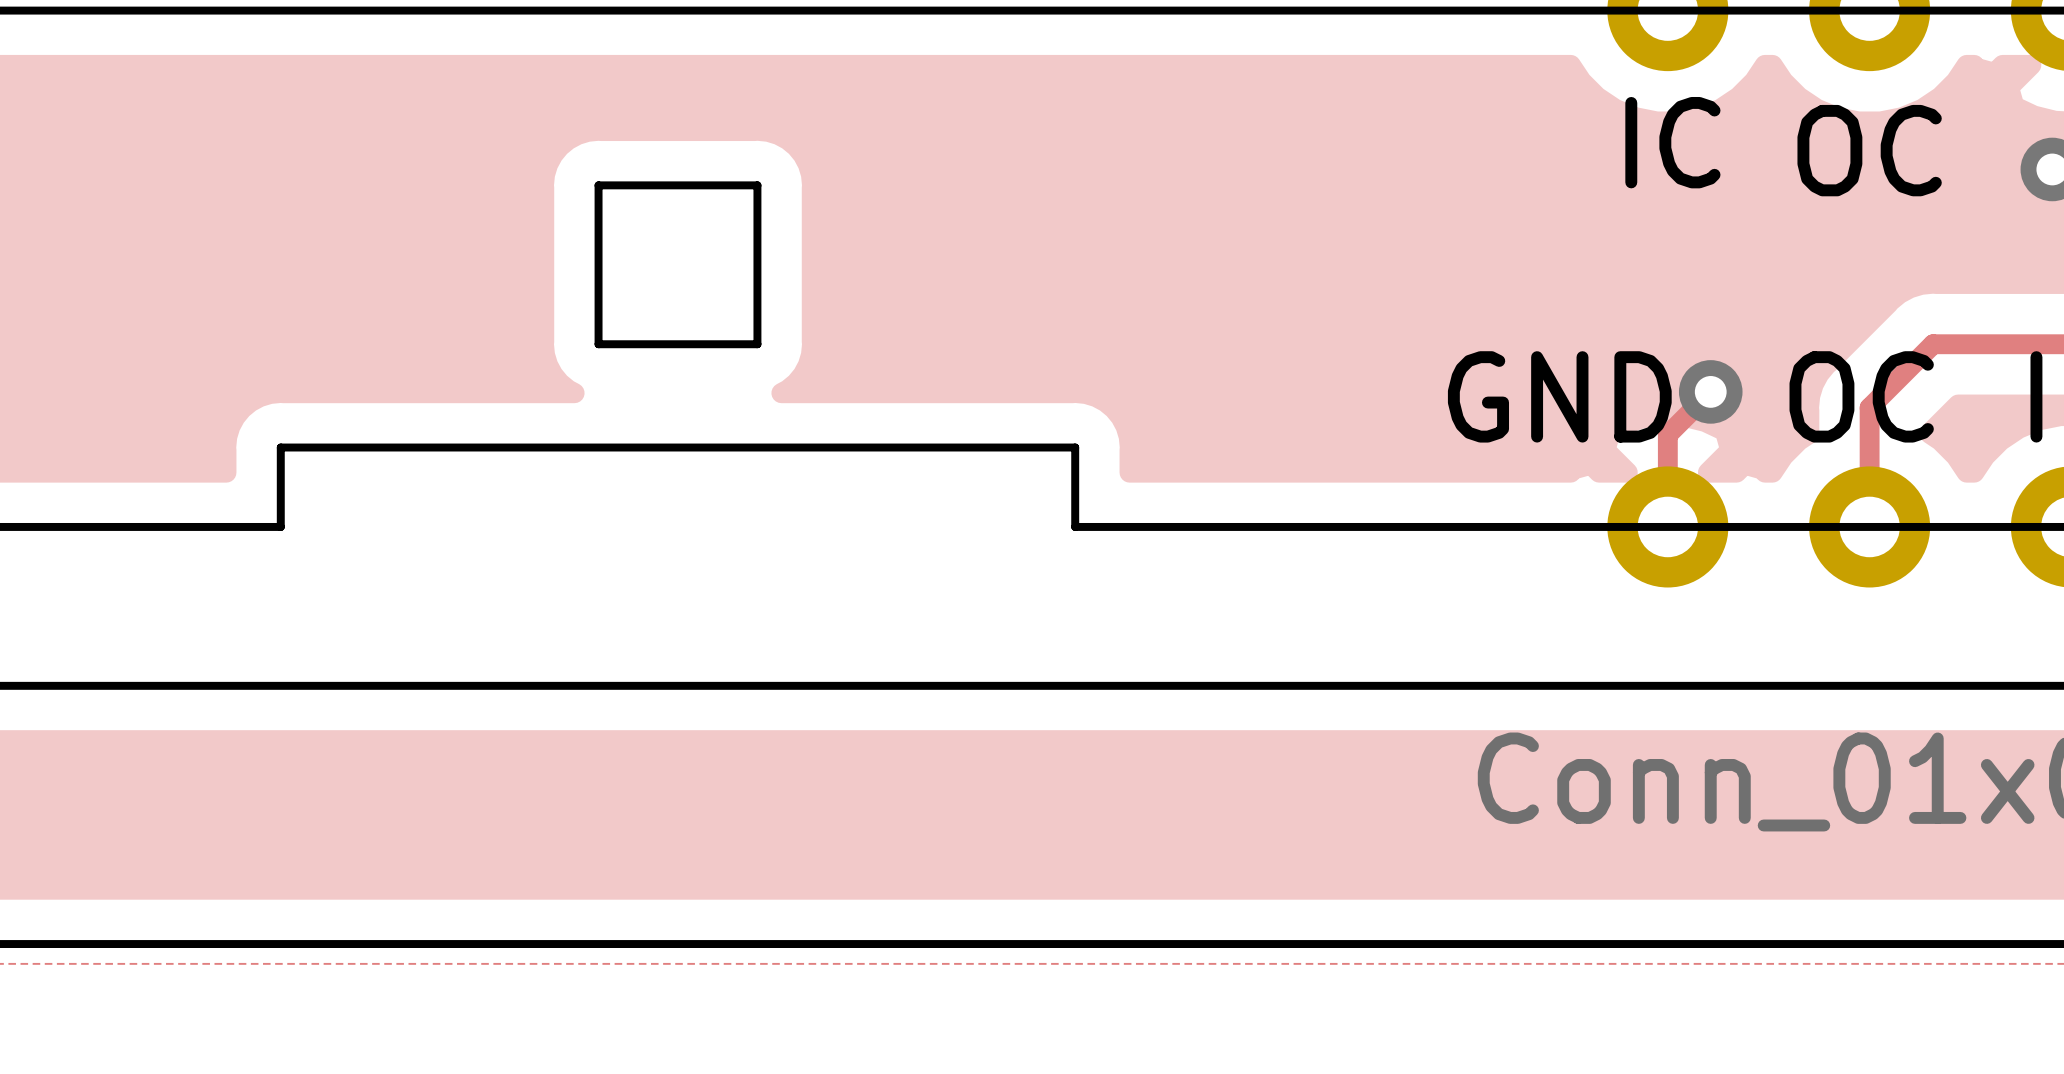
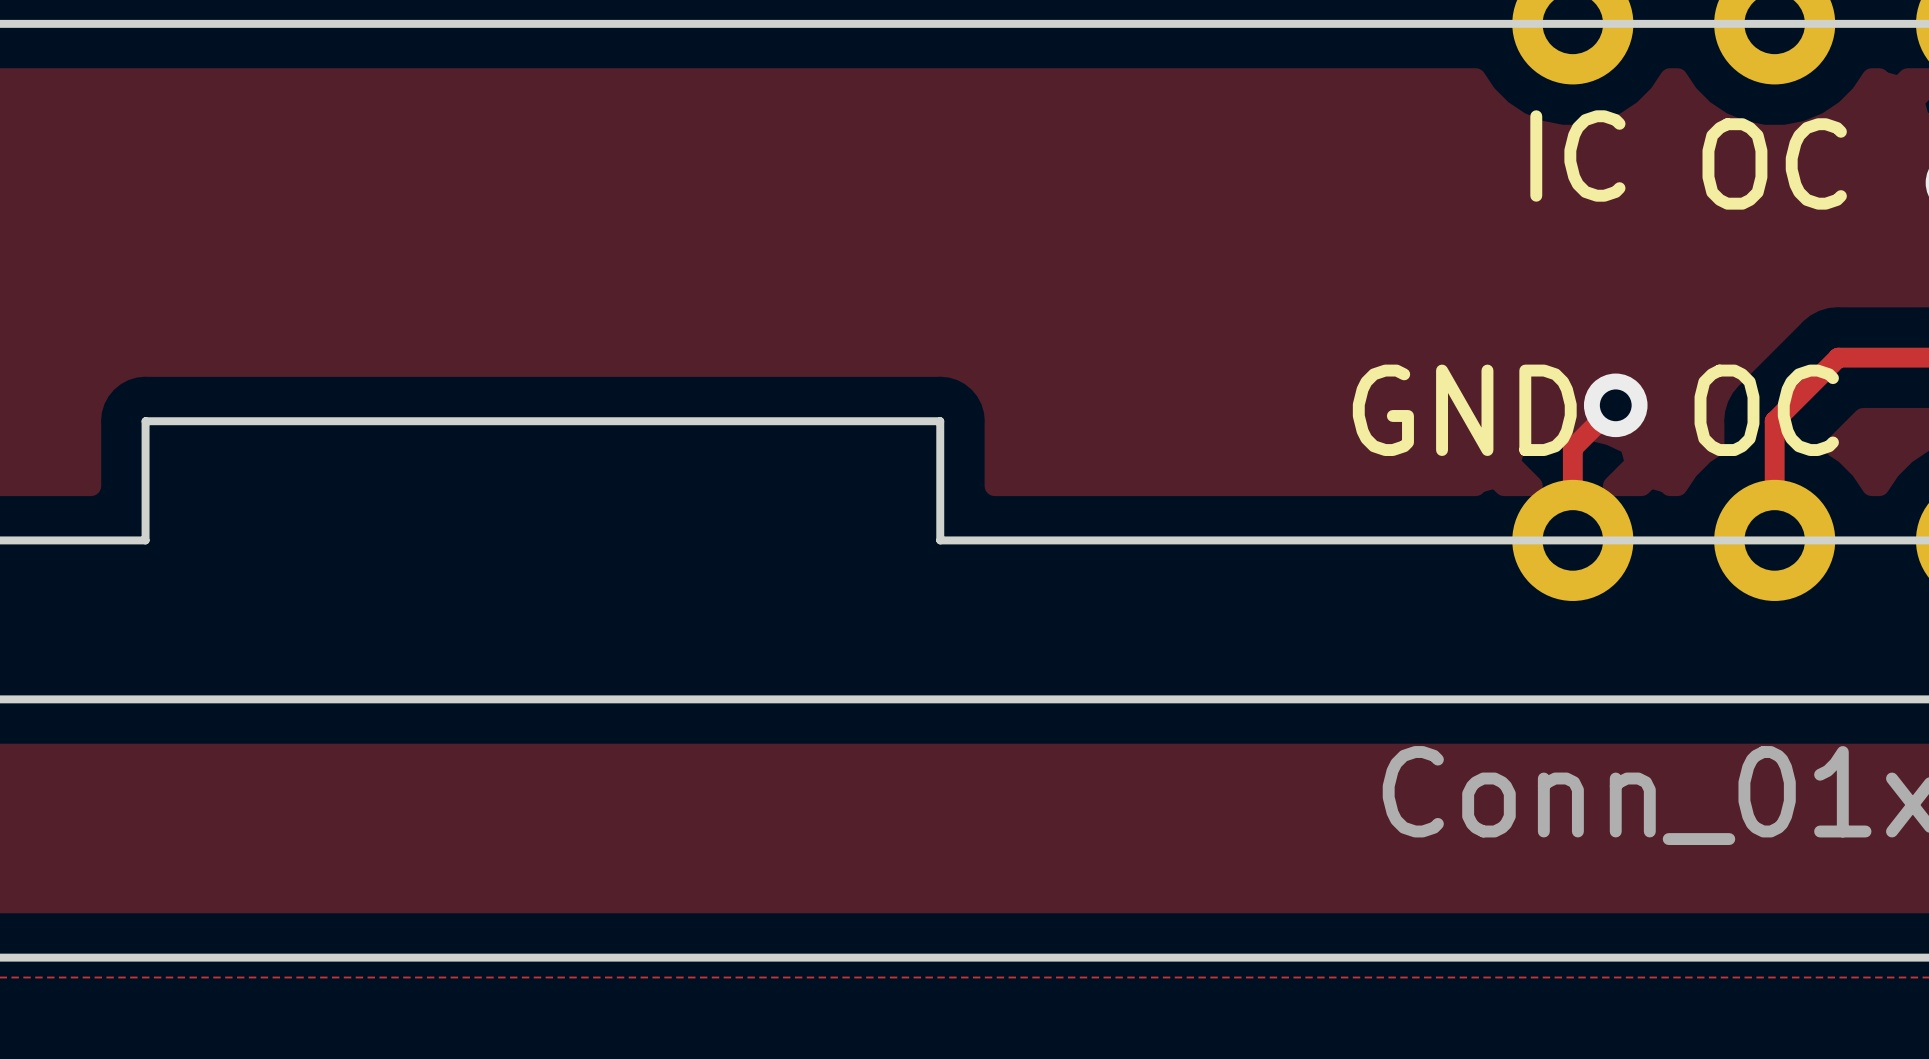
board edge: (598, 185) (598, 344) (757, 344) (757, 185) (598, 185) -> none
board edge: (241, 526) (280, 526) (280, 447) (1075, 447) (1075, 526) -> (145, 540) (145, 421) (940, 421) (940, 540) (979, 540)

